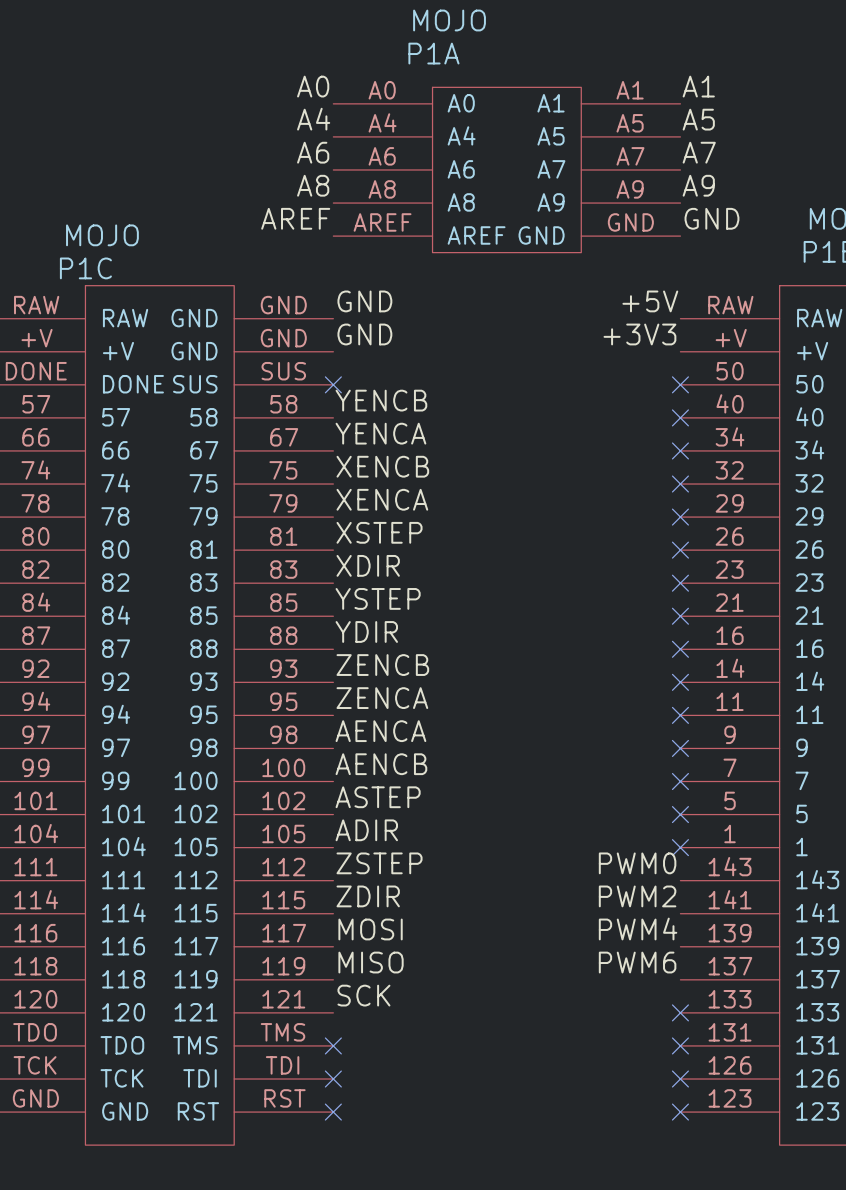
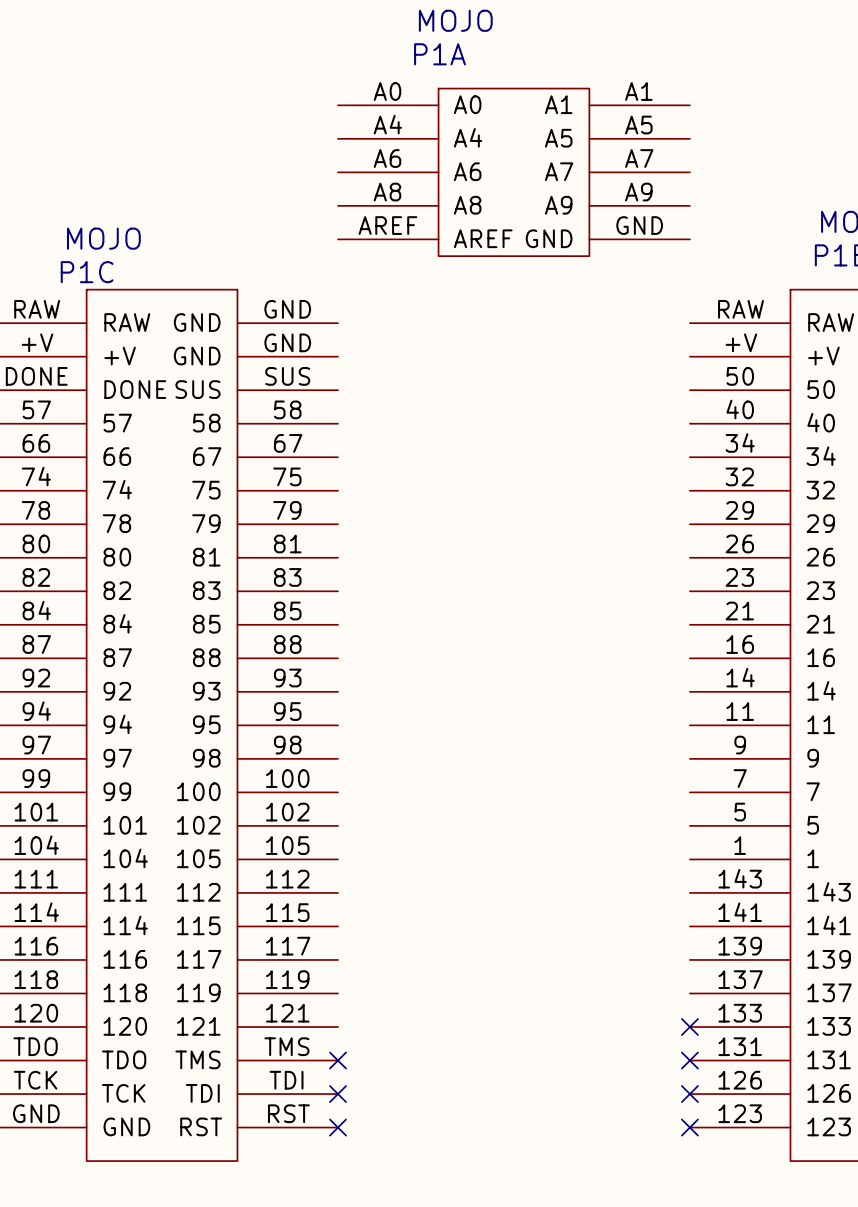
label: A0 (313, 86) -> none
label: A1 (698, 86) -> none
label: A4 (313, 119) -> none
label: A5 (698, 119) -> none
label: A6 (313, 152) -> none
label: A7 (699, 152) -> none
label: A8 (313, 185) -> none
label: A9 (698, 185) -> none
label: AREF (295, 218) -> none
label: GND (711, 218) -> none
label: GND (364, 301) -> none
label: +5V (650, 301) -> none
label: GND (364, 334) -> none
label: +3V3 (639, 334) -> none
no-connect mark: (333, 384) -> none
no-connect mark: (680, 384) -> none
label: YENCB (381, 400) -> none
no-connect mark: (680, 417) -> none
label: YENCA (380, 433) -> none
no-connect mark: (680, 450) -> none
label: XENCB (382, 466) -> none
no-connect mark: (680, 484) -> none
label: XENCA (382, 499) -> none
no-connect mark: (680, 517) -> none
label: XSTEP (379, 532) -> none
no-connect mark: (680, 550) -> none
label: XDIR (368, 565) -> none
no-connect mark: (680, 583) -> none
label: YSTEP (378, 598) -> none
no-connect mark: (680, 616) -> none
label: YDIR (366, 631) -> none
no-connect mark: (680, 649) -> none
label: ZENCB (382, 665) -> none
no-connect mark: (680, 682) -> none
label: ZENCA (382, 698) -> none
no-connect mark: (680, 715) -> none
label: AENCA (380, 731) -> none
no-connect mark: (680, 748) -> none
label: AENCB (381, 764) -> none
no-connect mark: (680, 781) -> none
label: ASTEP (378, 797) -> none
no-connect mark: (680, 814) -> none
label: ADIR (366, 830) -> none
no-connect mark: (680, 847) -> none
label: ZSTEP (379, 863) -> none
label: PWM0 (637, 863) -> none
label: ZDIR (368, 896) -> none
label: PWM2 (637, 896) -> none
label: MOSI (370, 929) -> none
label: PWM4 (638, 929) -> none
label: MISO (371, 962) -> none
label: PWM6 (637, 962) -> none
label: SCK (363, 995) -> none

